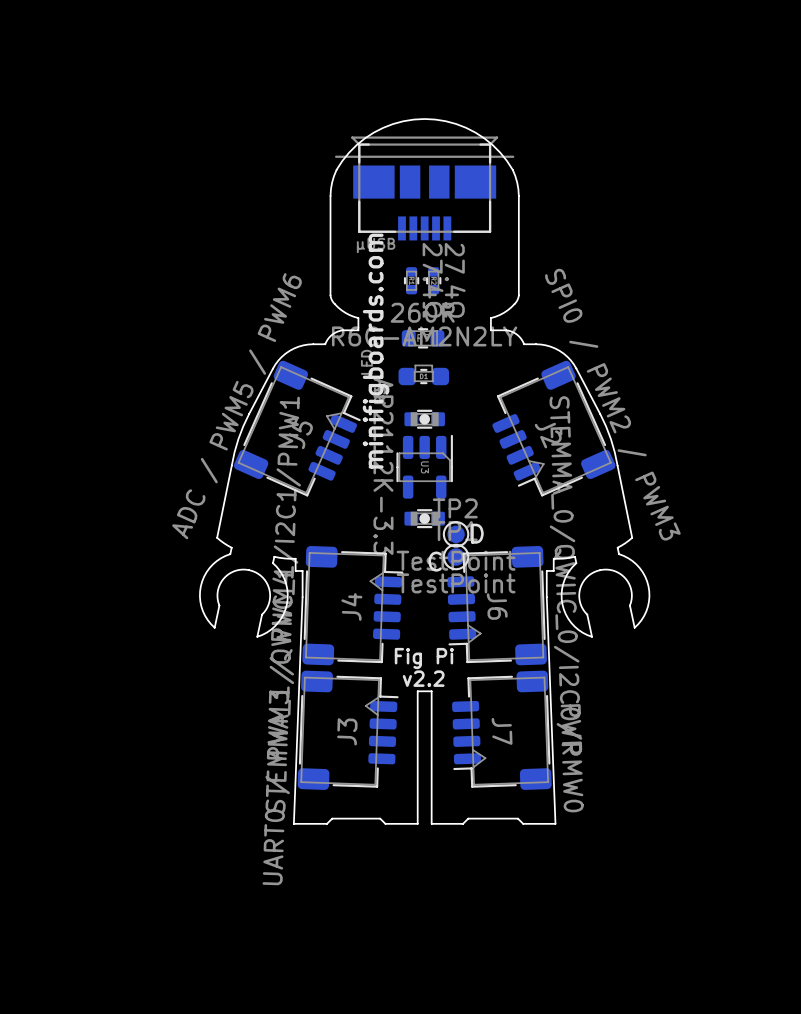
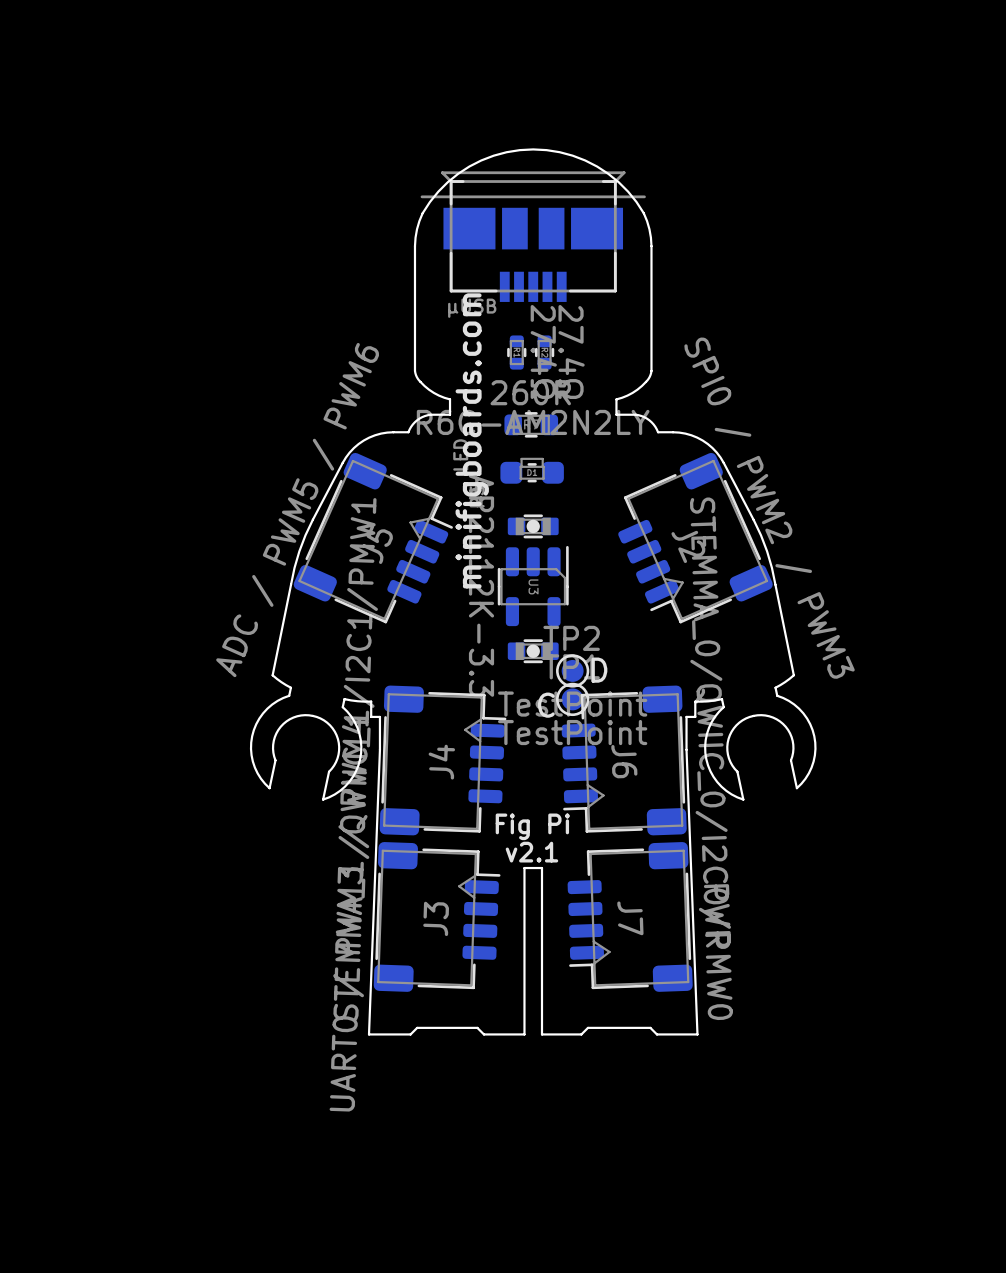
text: v2.2 (423, 678) -> v2.1 (531, 852)

